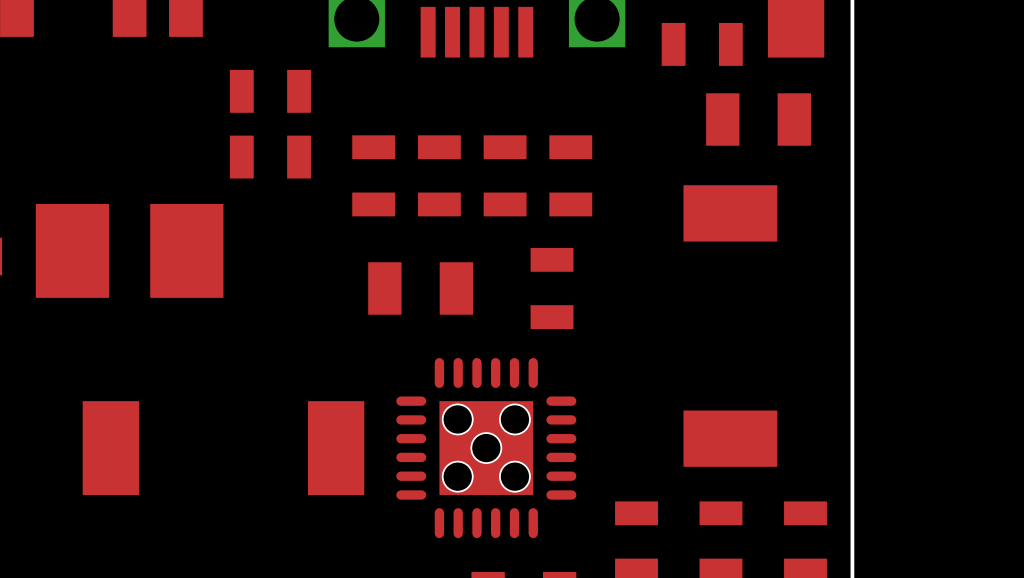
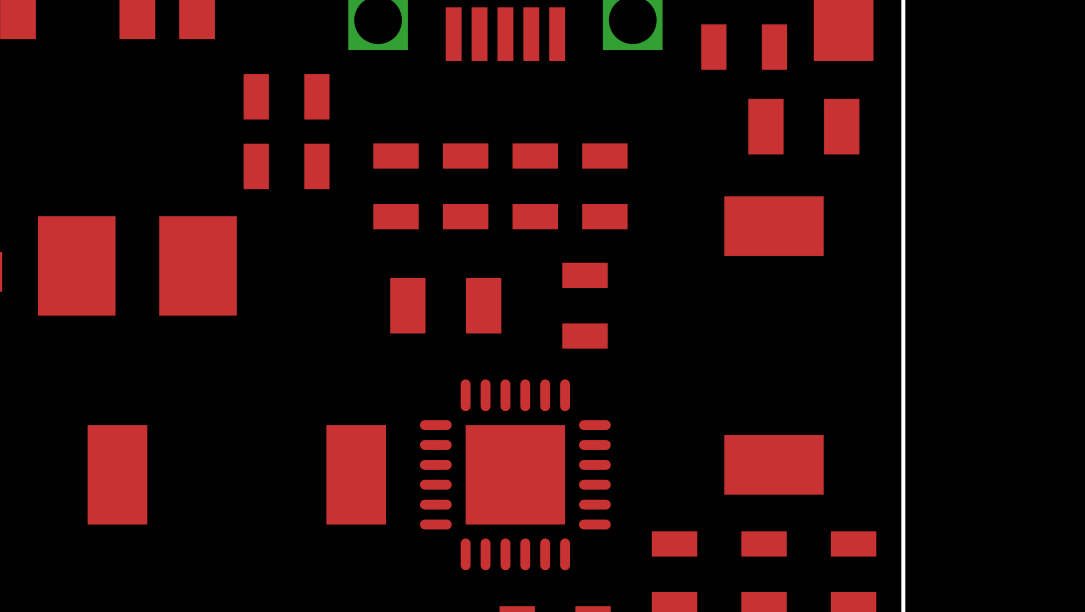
part footprint: [396, 357, 577, 539] -> [419, 379, 611, 571]

